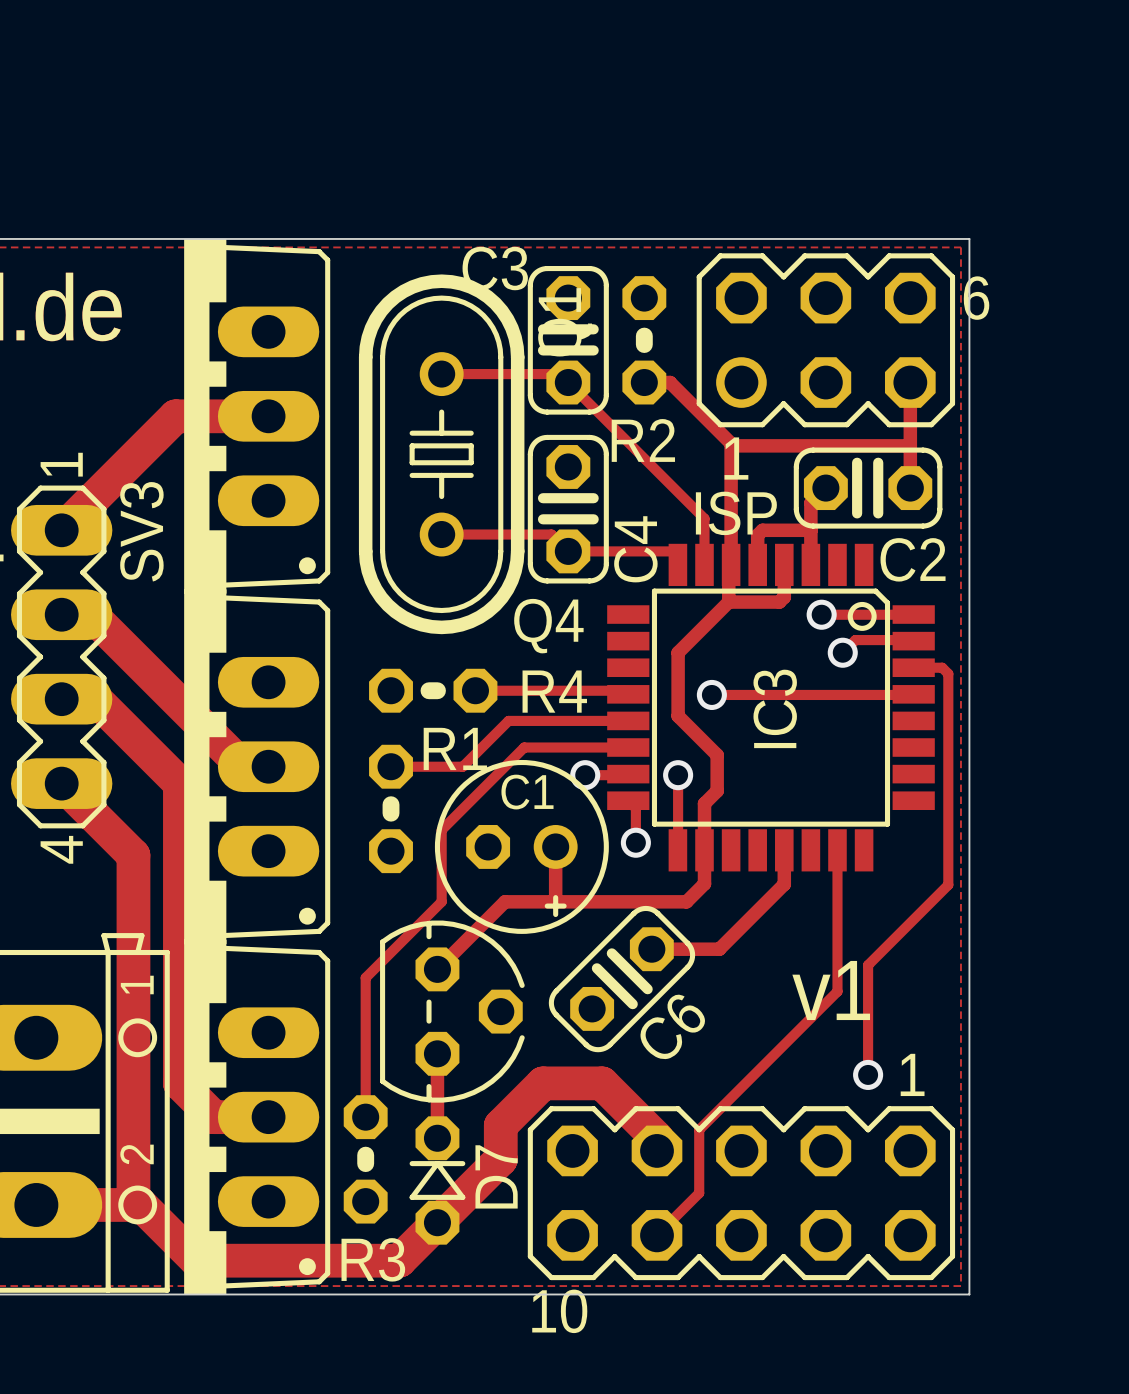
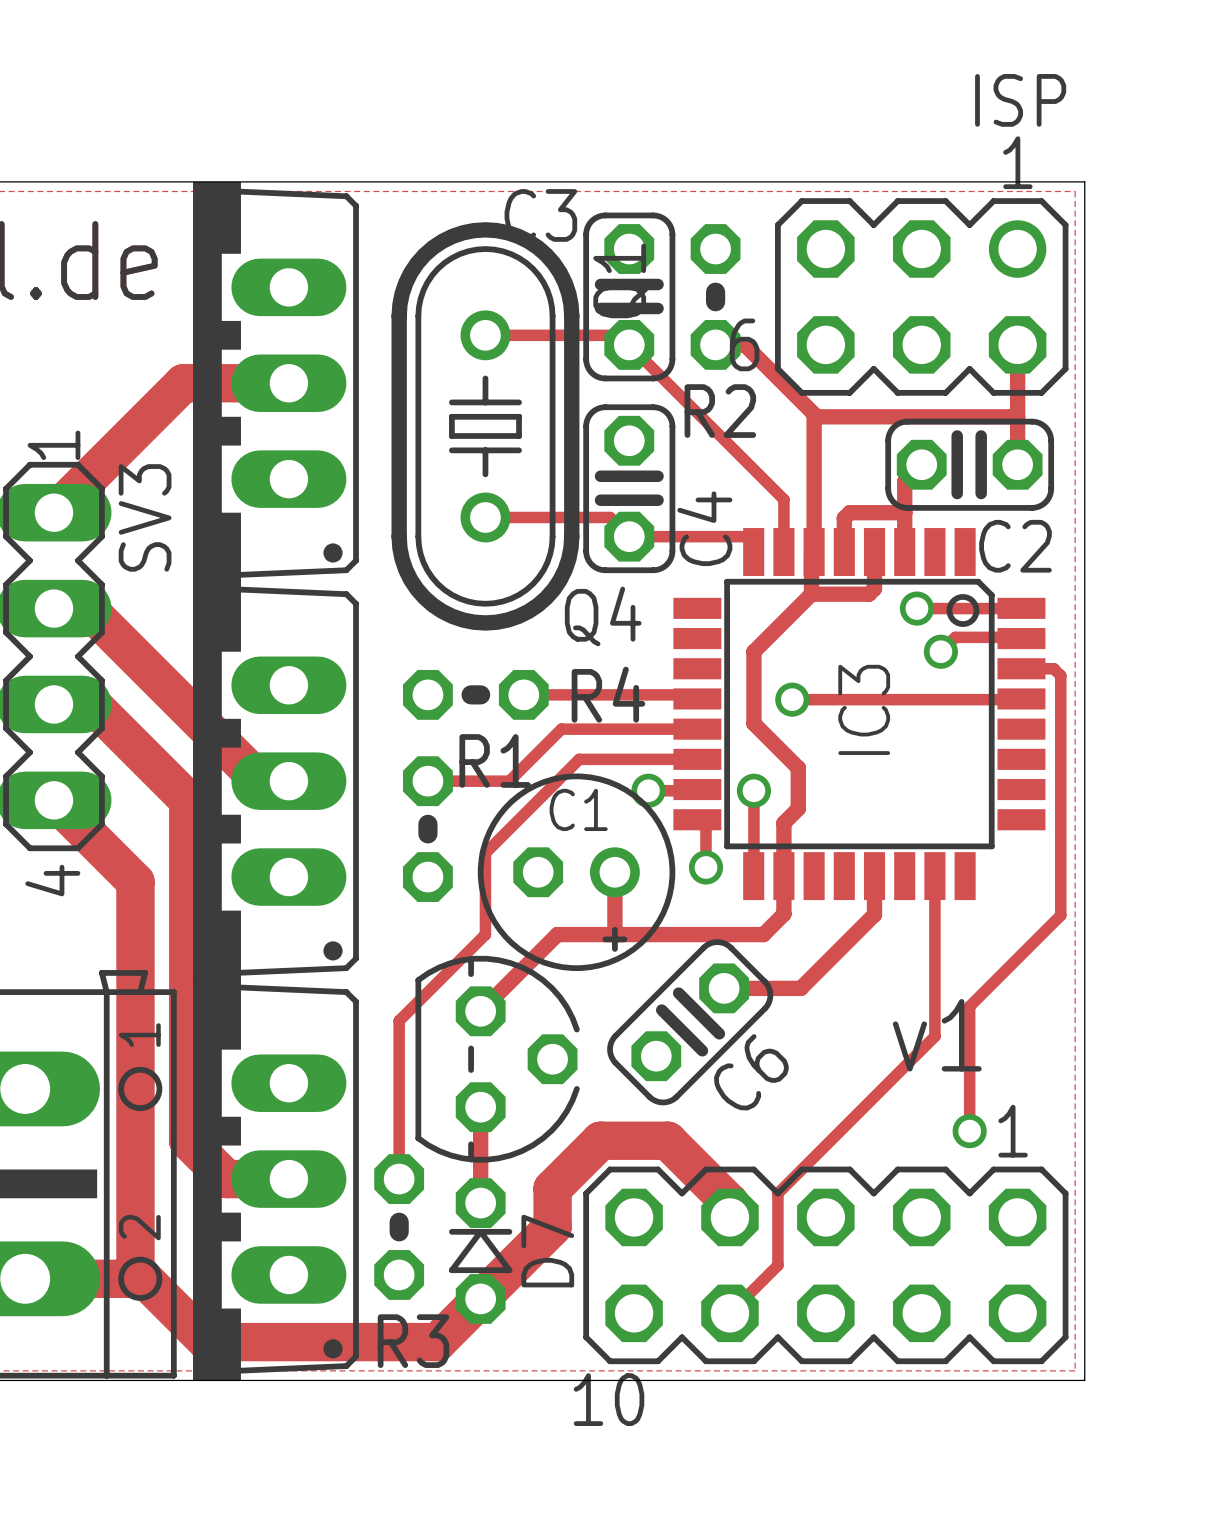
ISP footprint: [696, 253, 956, 428] -> [775, 198, 1069, 396]
ISP name position: ISP (736, 513) -> ISP (1020, 100)

